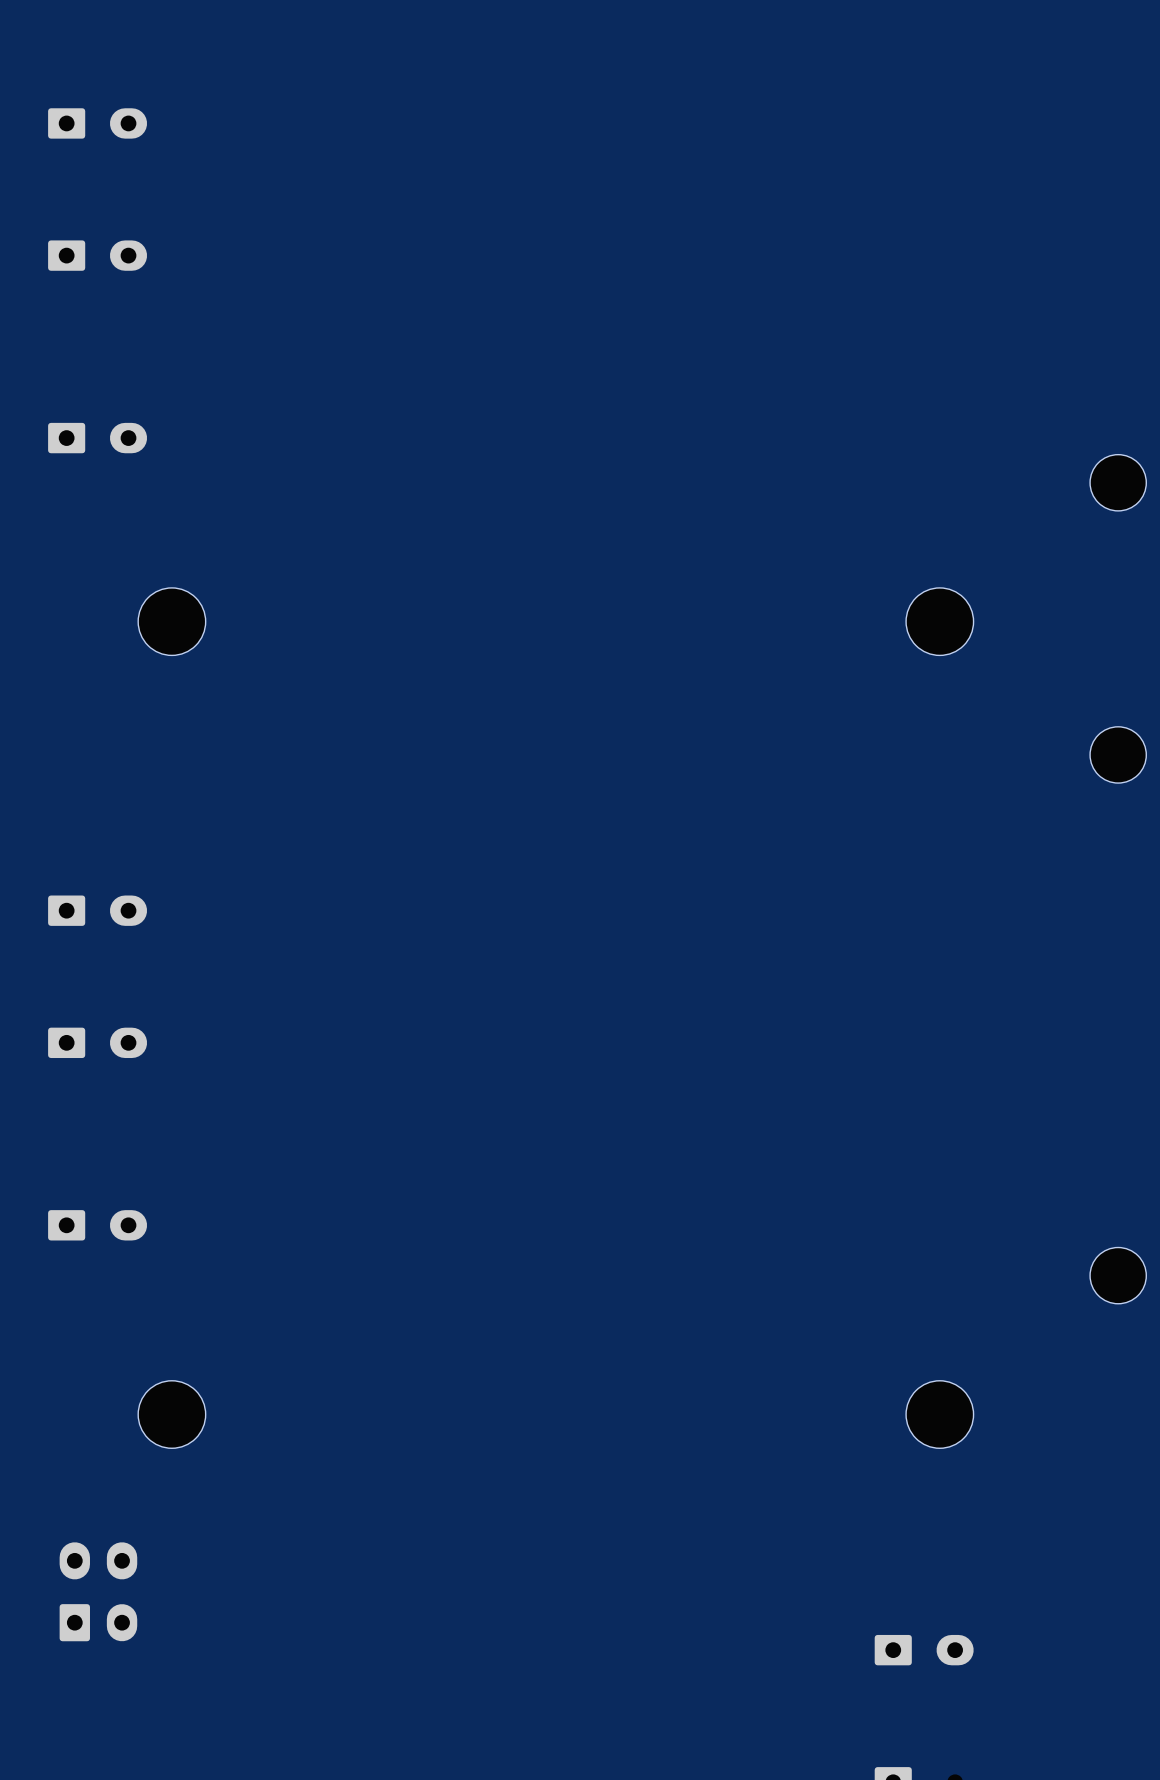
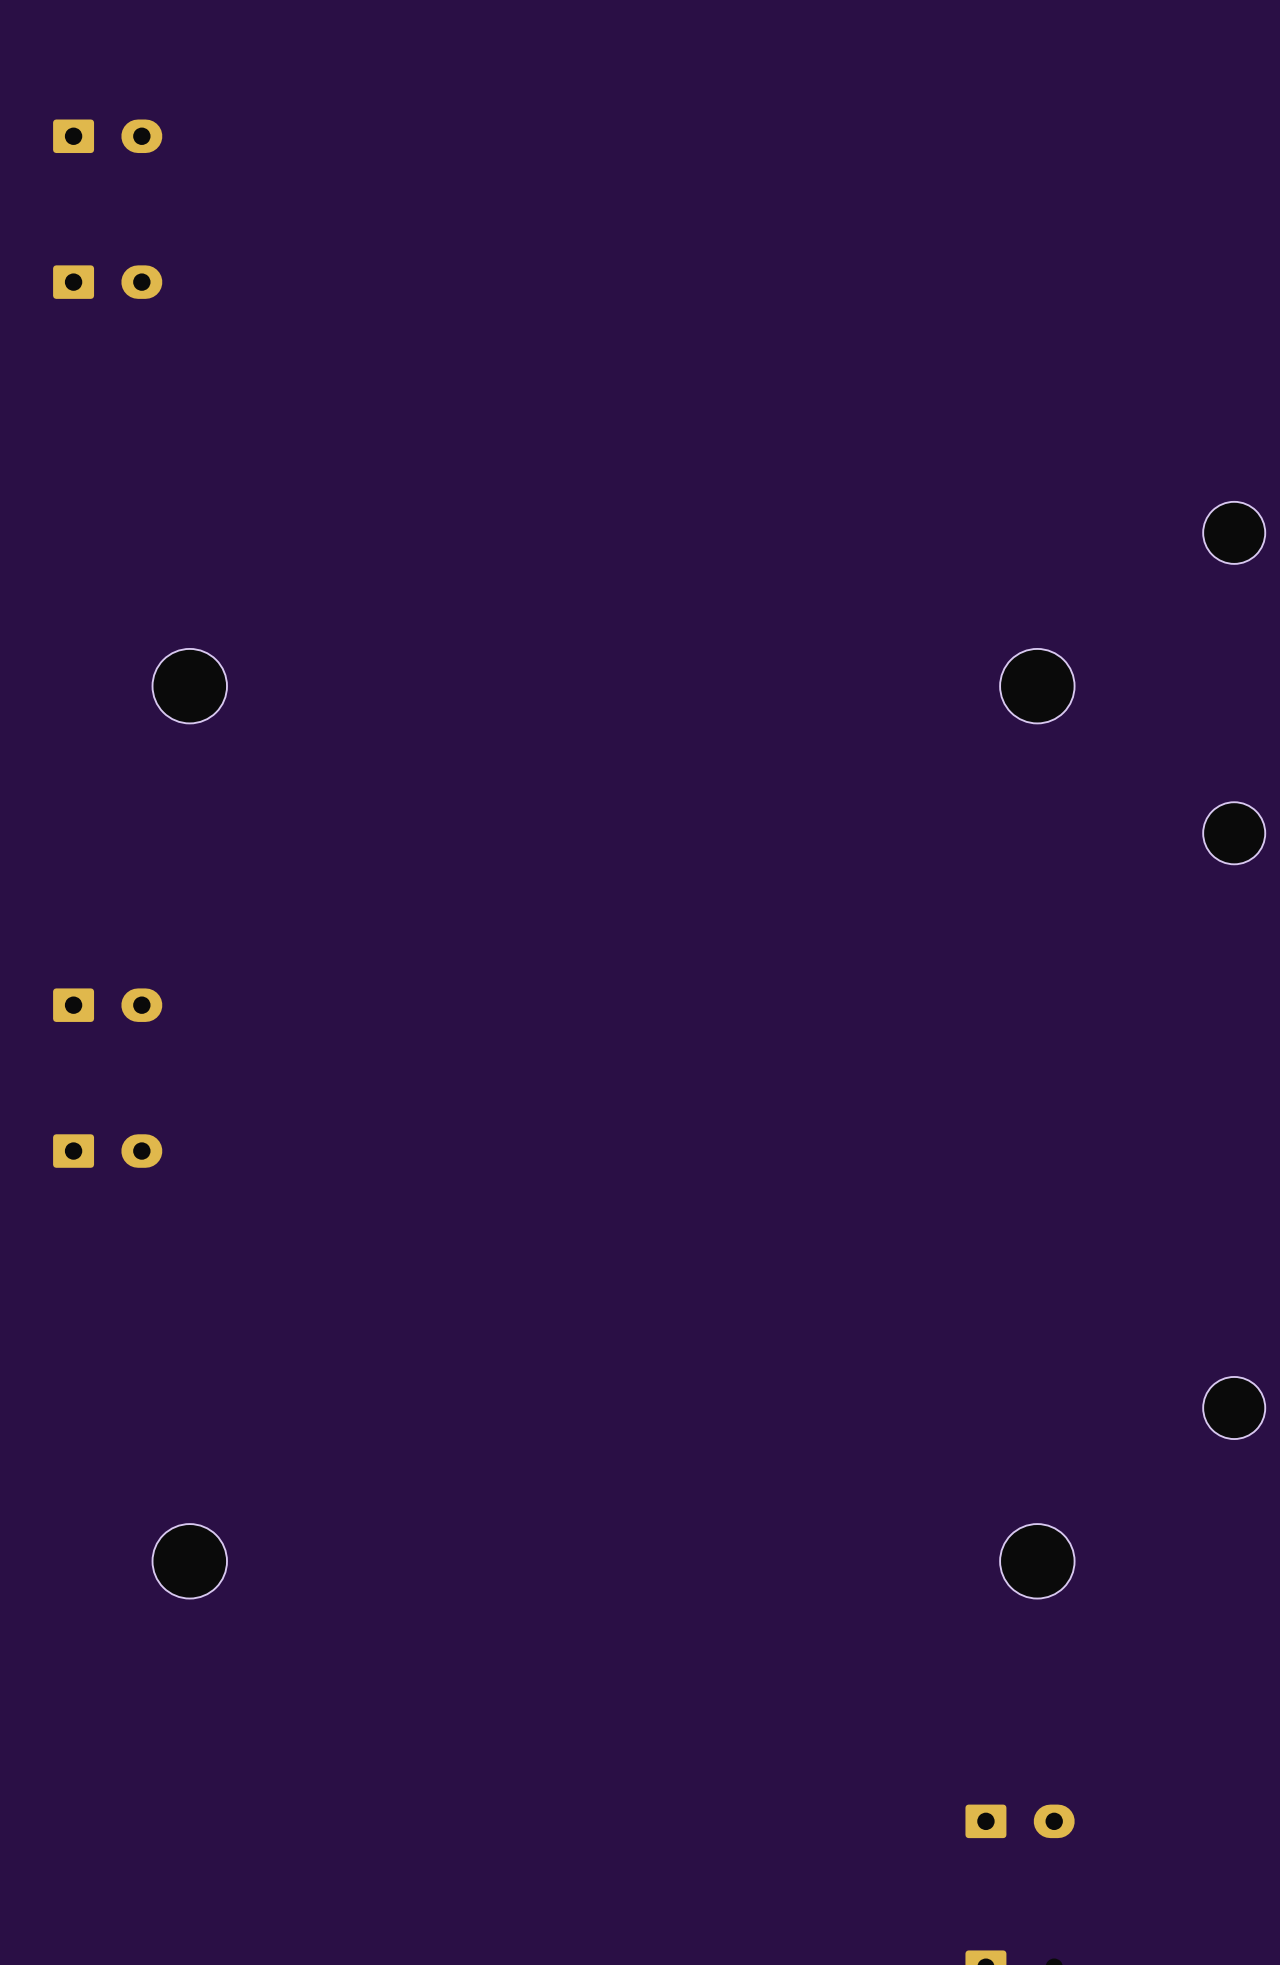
part: (97, 438) -> none
part: (97, 1225) -> none
part: (98, 1591) -> none

